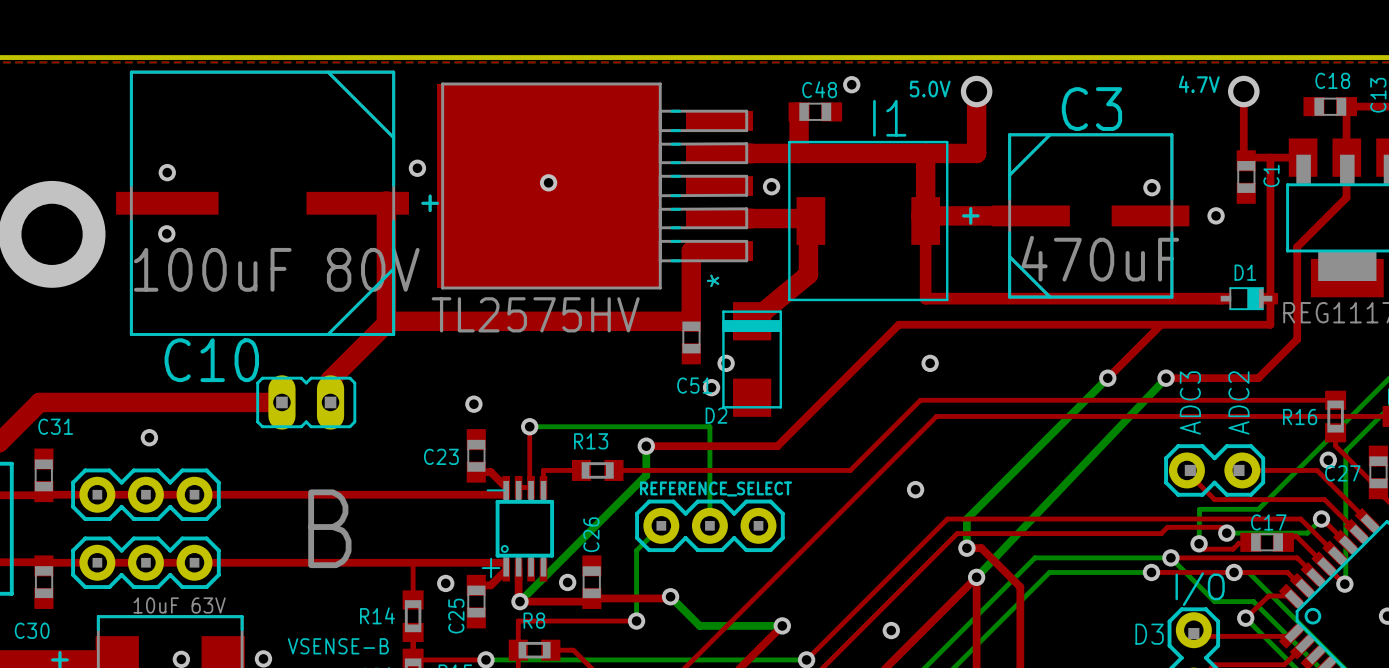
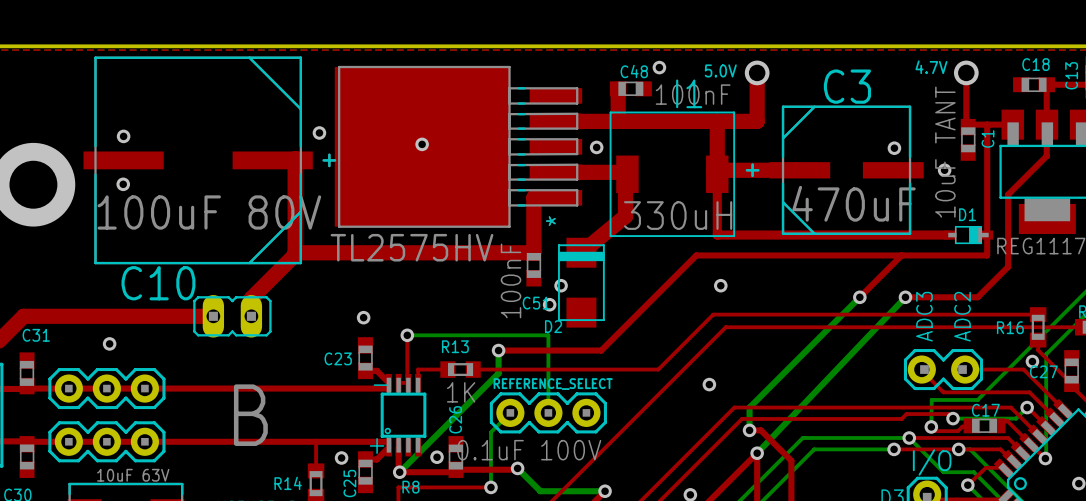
C48 value: none -> 100nF (693, 94)
C1 value: none -> 10uF TANT (945, 152)
text: none -> 330uH (678, 215)
C51 value: none -> 100nF (511, 280)
R13 value: none -> 1K (461, 392)
C26 value: none -> 0.1uF 100V (529, 450)

